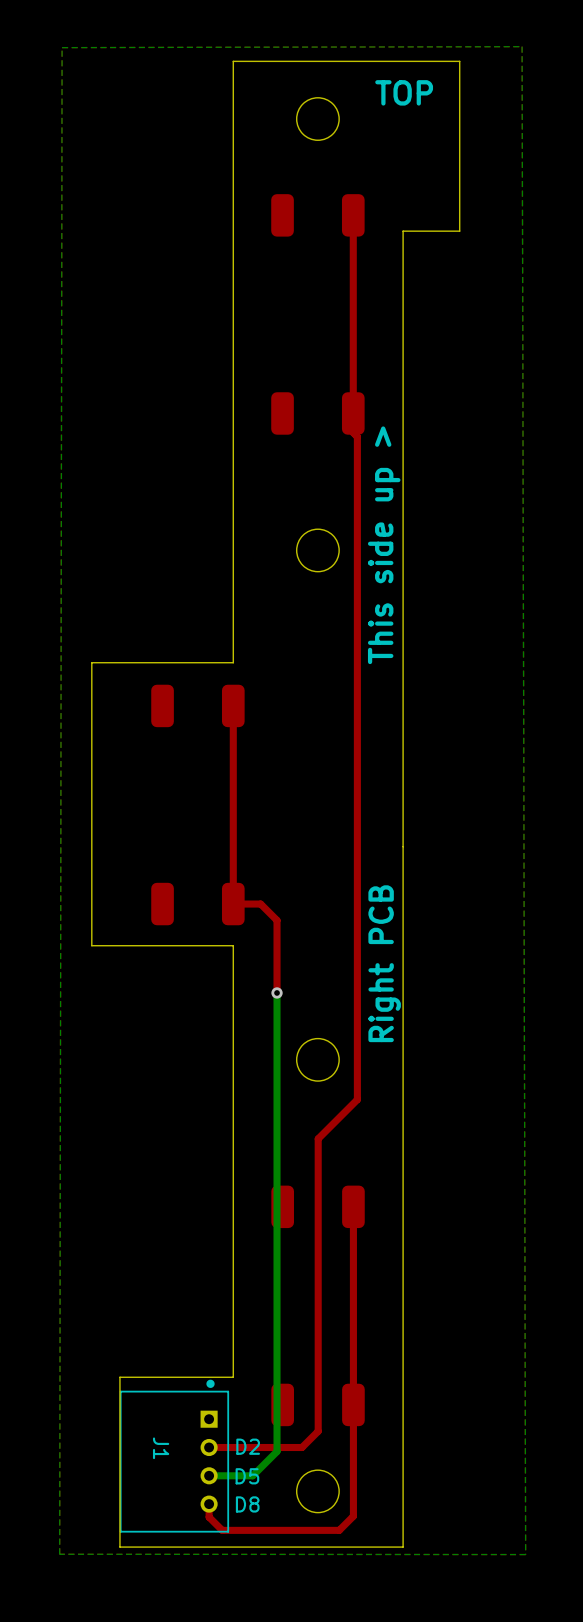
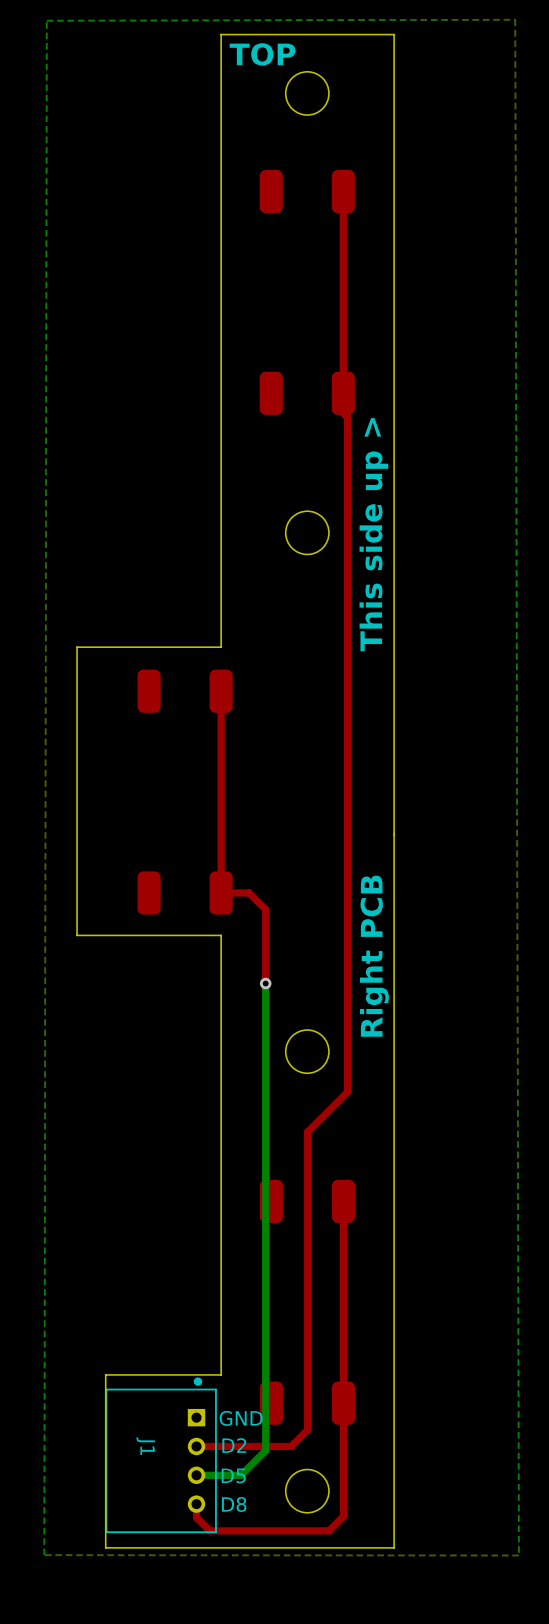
board edge: (233, 61) (459, 61) (459, 231) (403, 231) -> (221, 34) (394, 34) (394, 207)
text position: TOP (404, 92) -> TOP (262, 54)
text: none -> GND (241, 1418)

